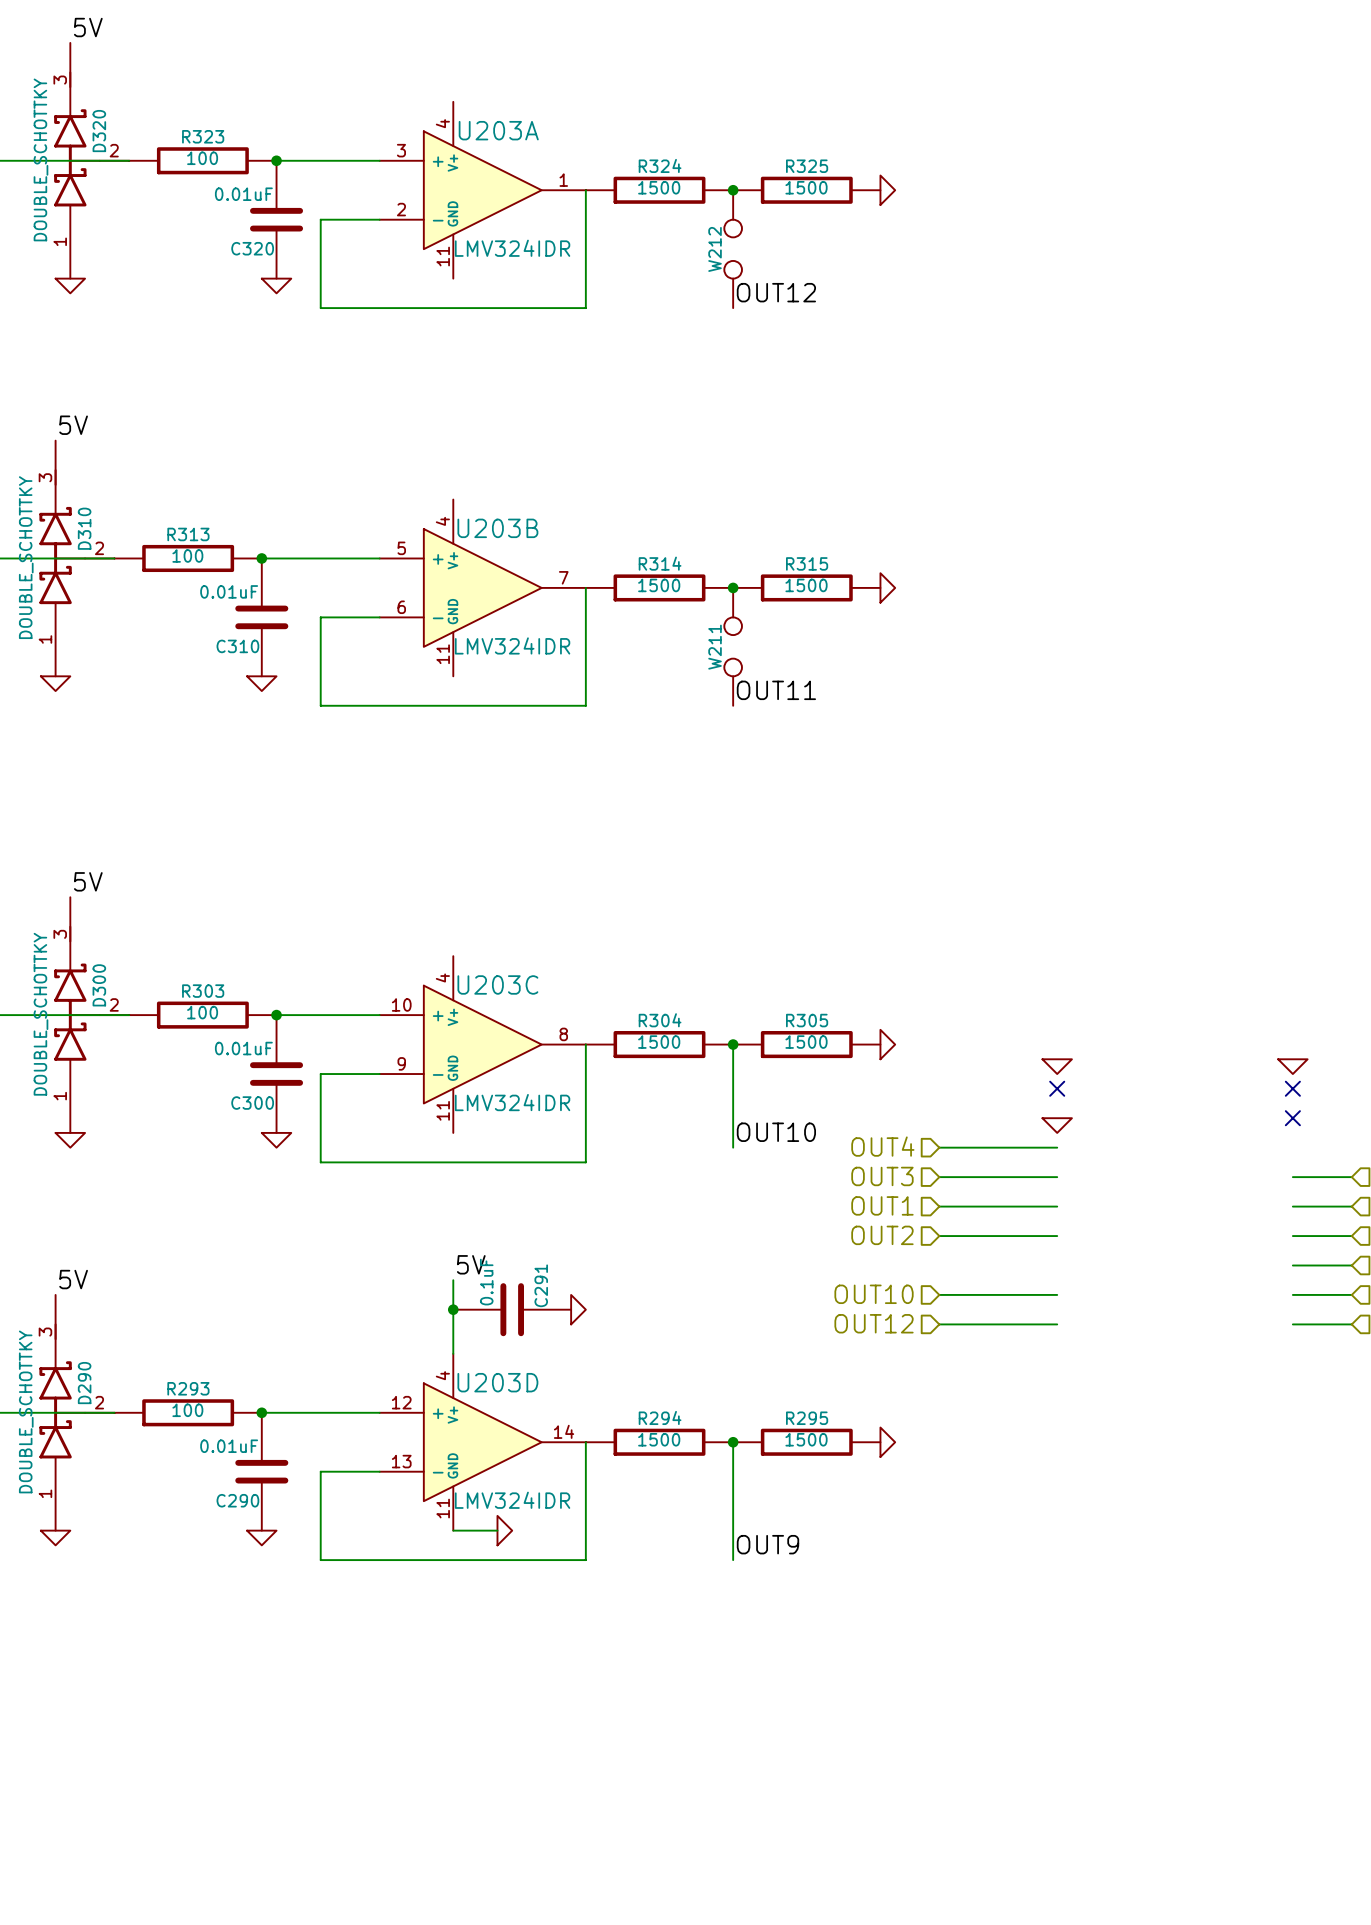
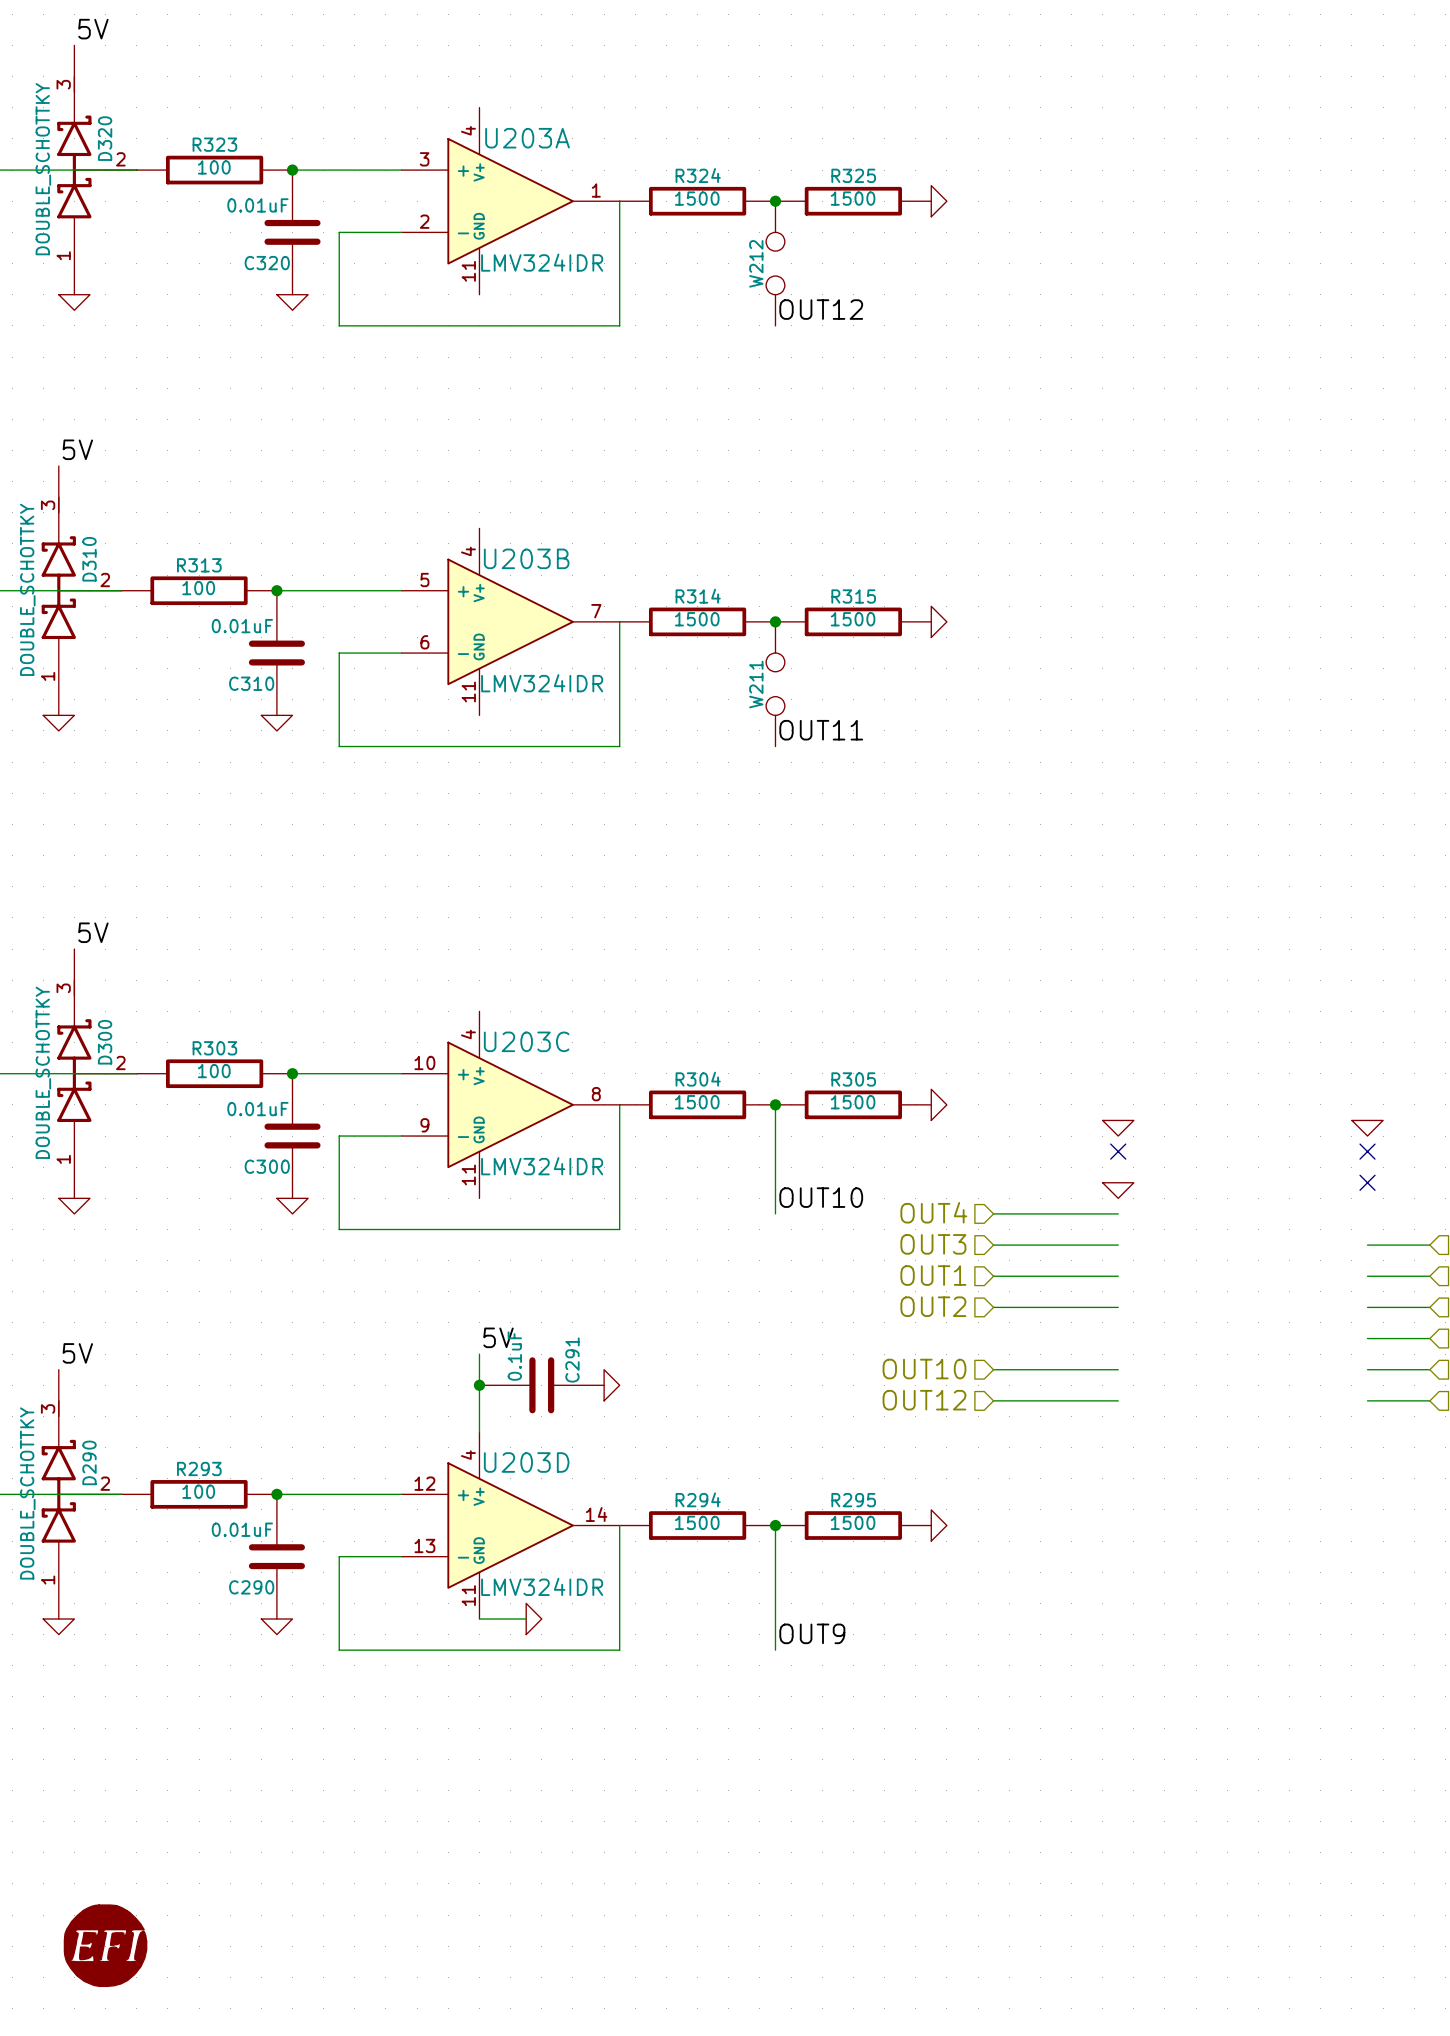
part: none -> (105, 1945)

